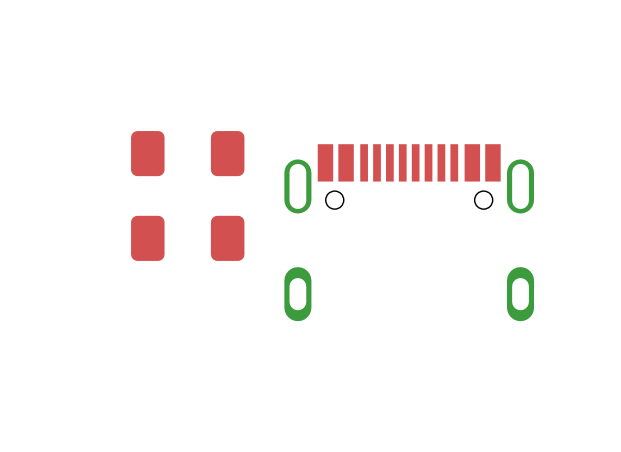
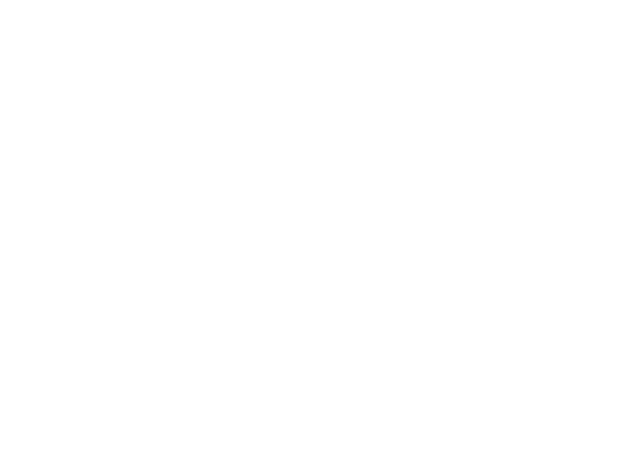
part: (187, 153) -> none
part: (409, 232) -> none
part: (187, 238) -> none

